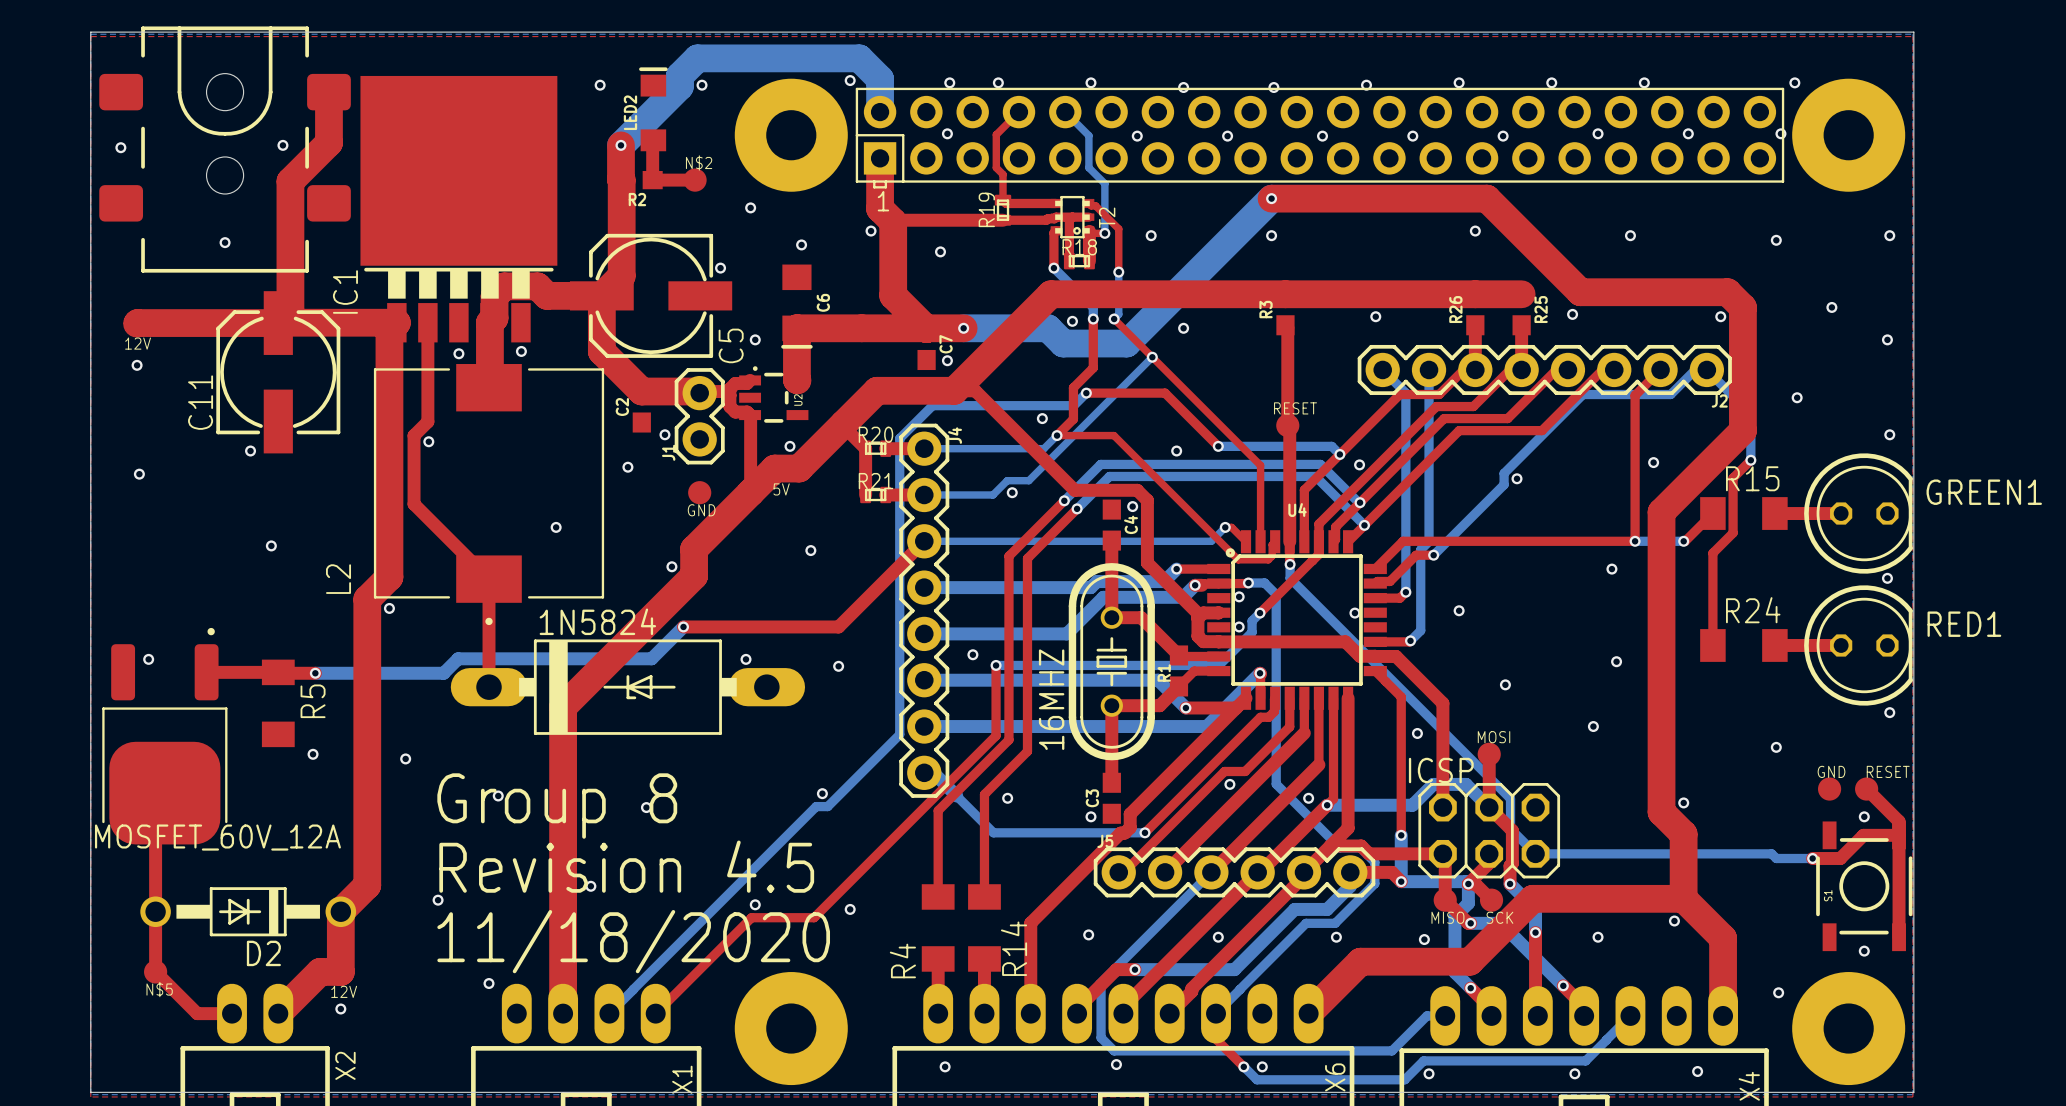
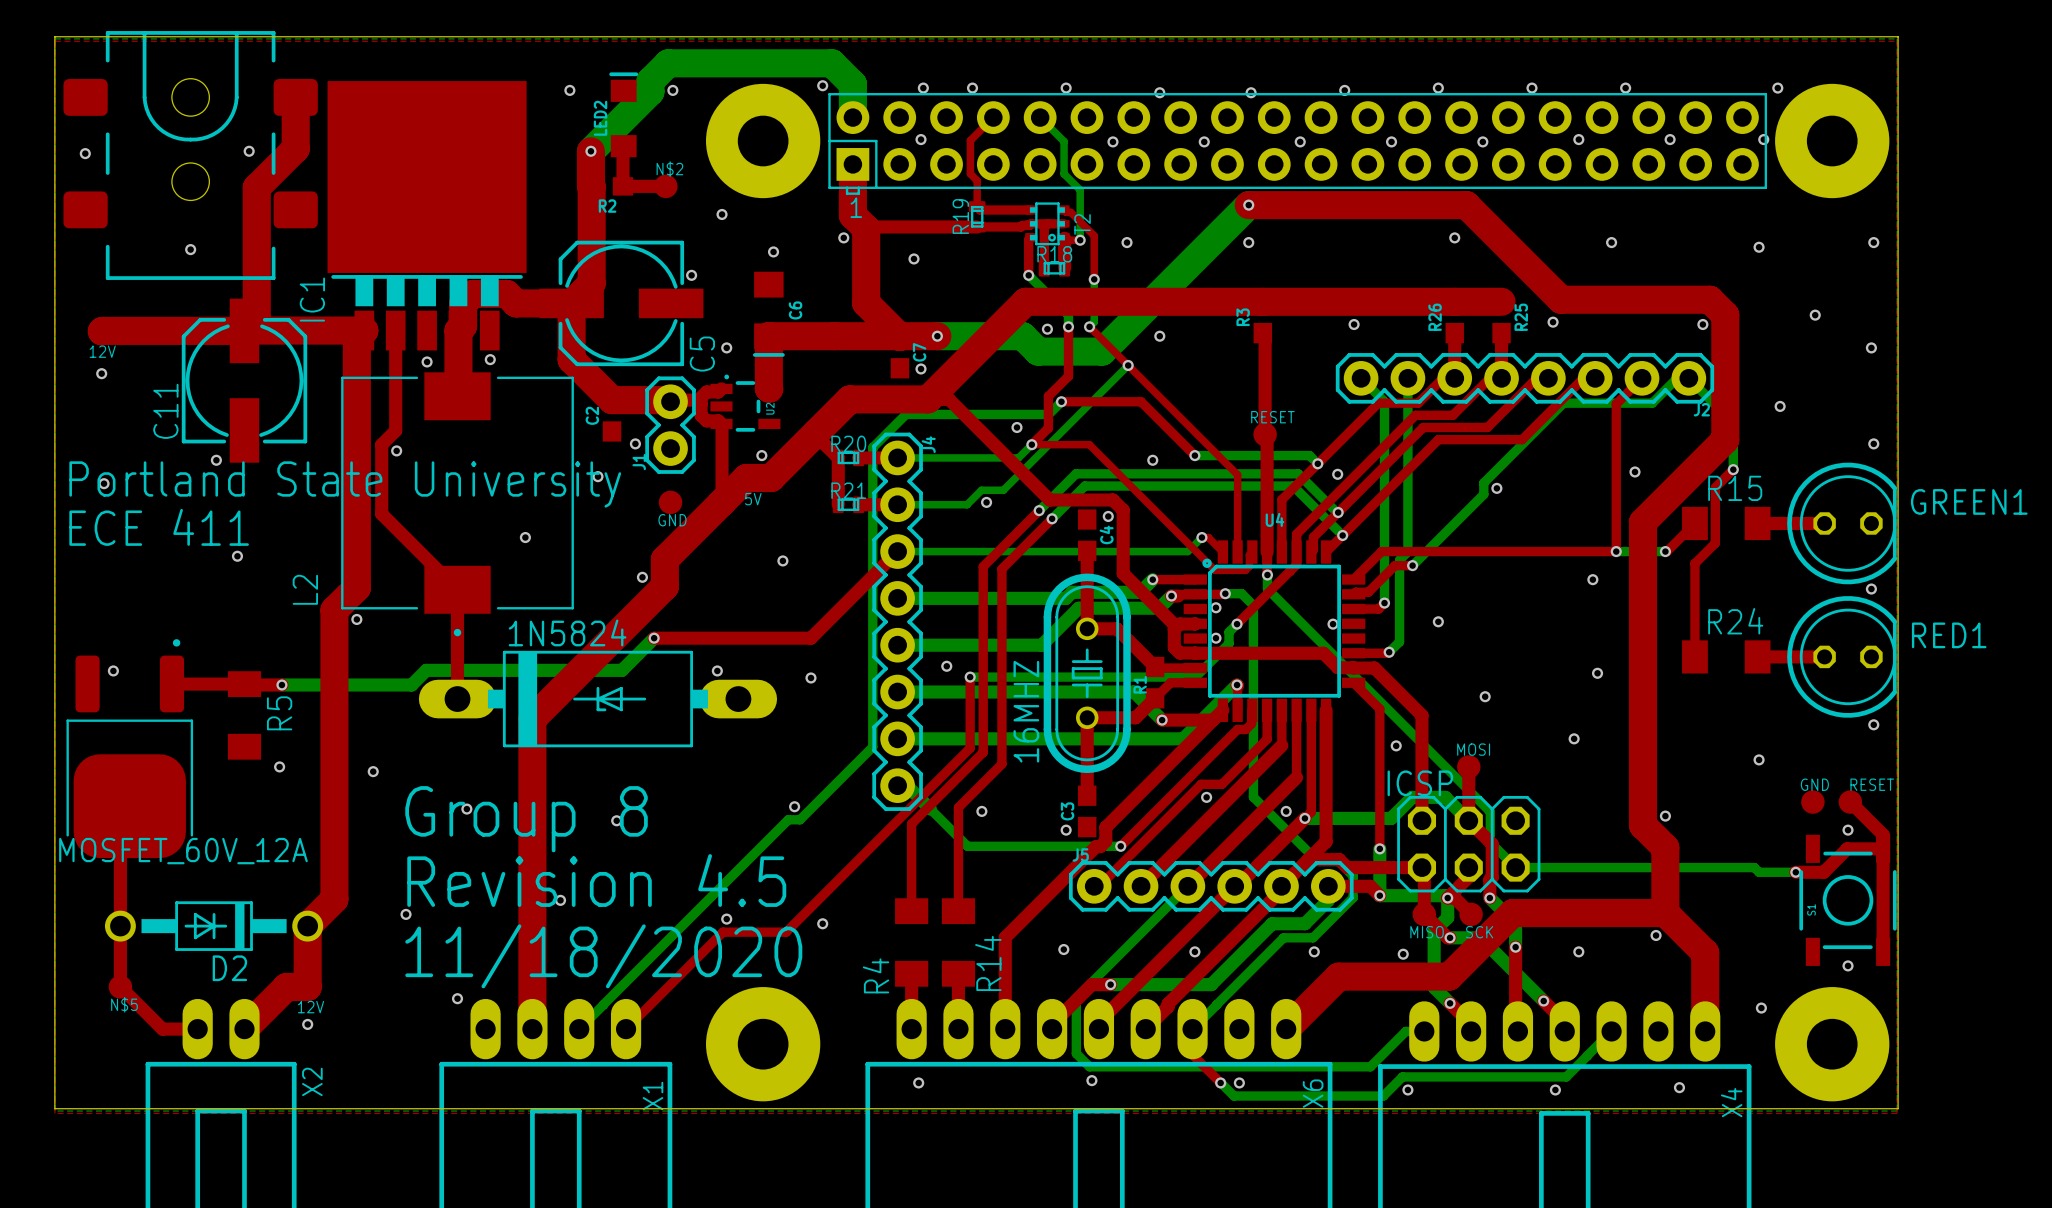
text: none -> Portland State University (345, 484)
text: none -> ECE 411 (159, 527)

